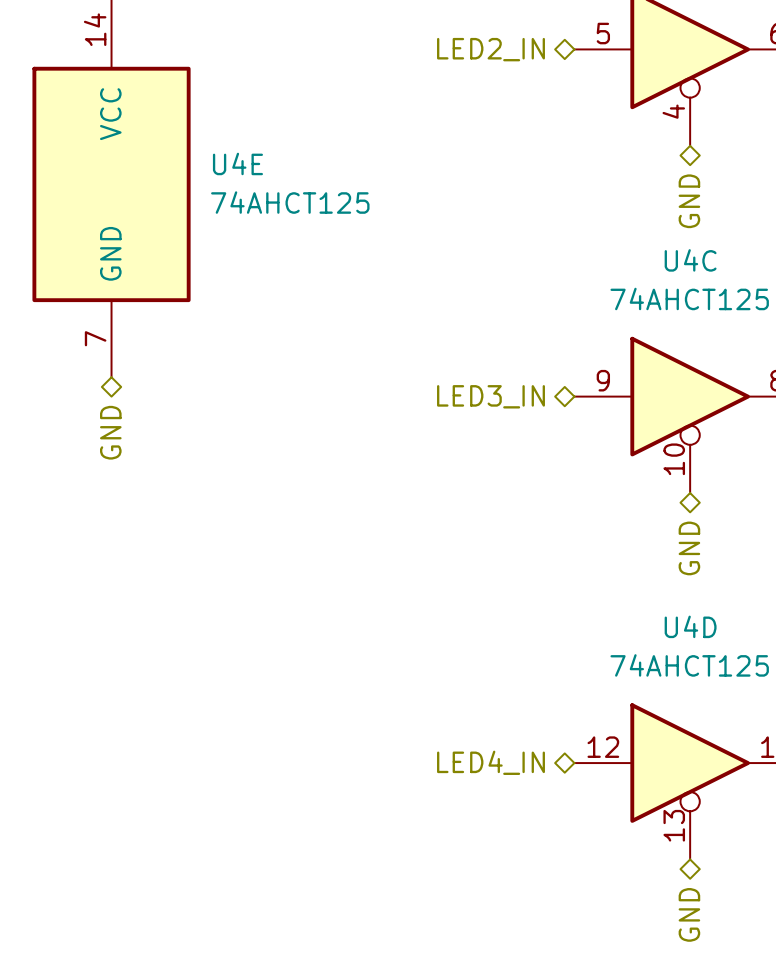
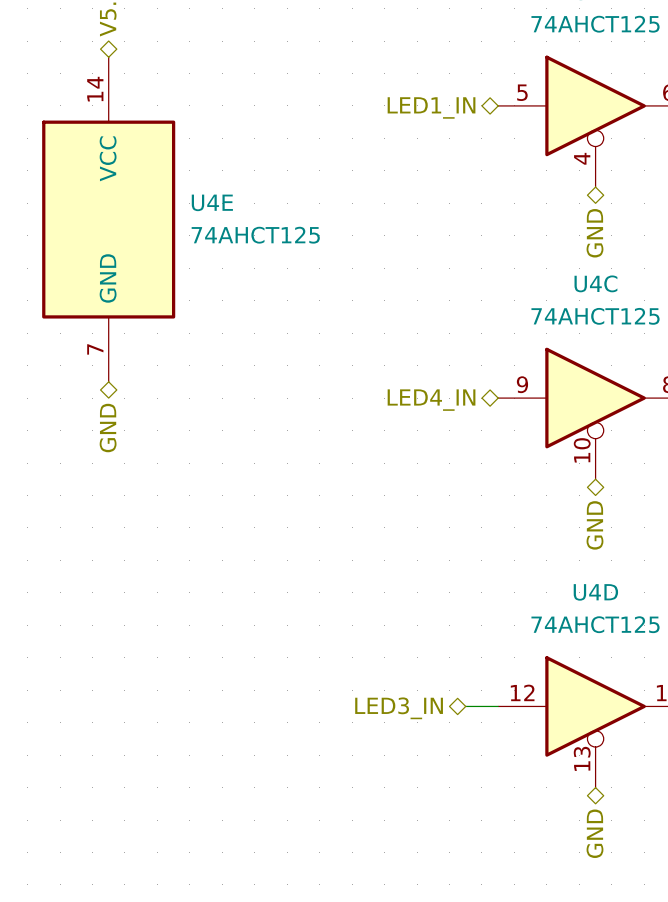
hierarchical label: LED2_IN (490, 49) -> LED1_IN (431, 107)
hierarchical label: LED3_IN (490, 396) -> LED4_IN (431, 400)
hierarchical label: LED4_IN (490, 762) -> LED3_IN (399, 708)
wire: none -> (465, 706) (498, 706)

